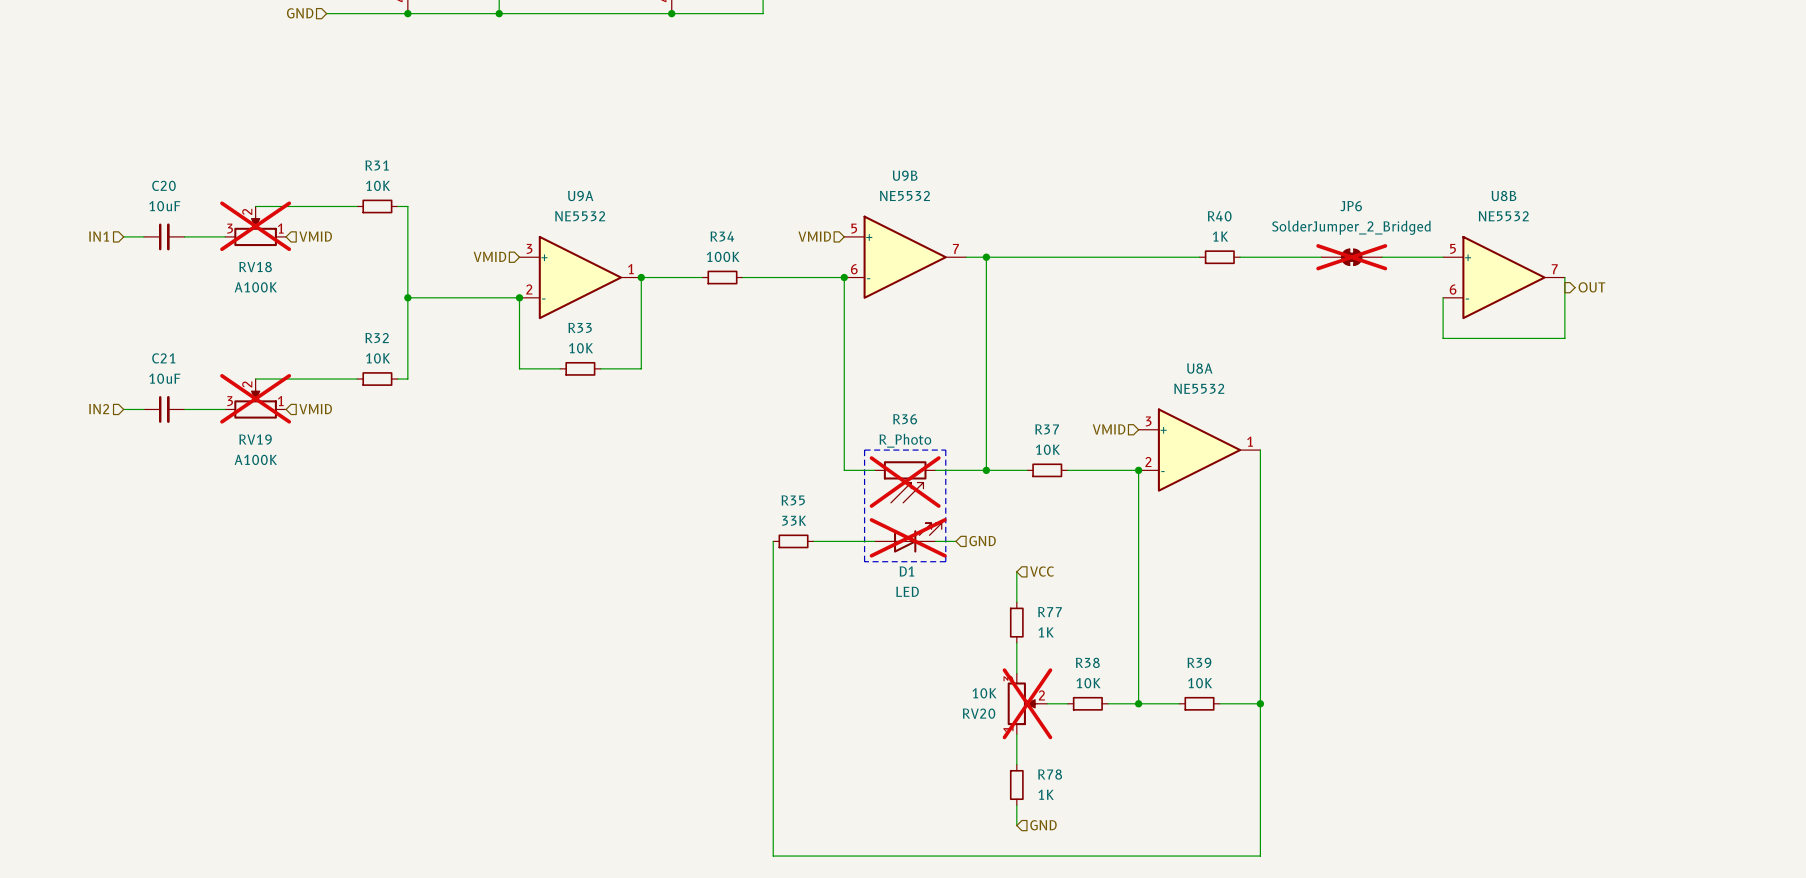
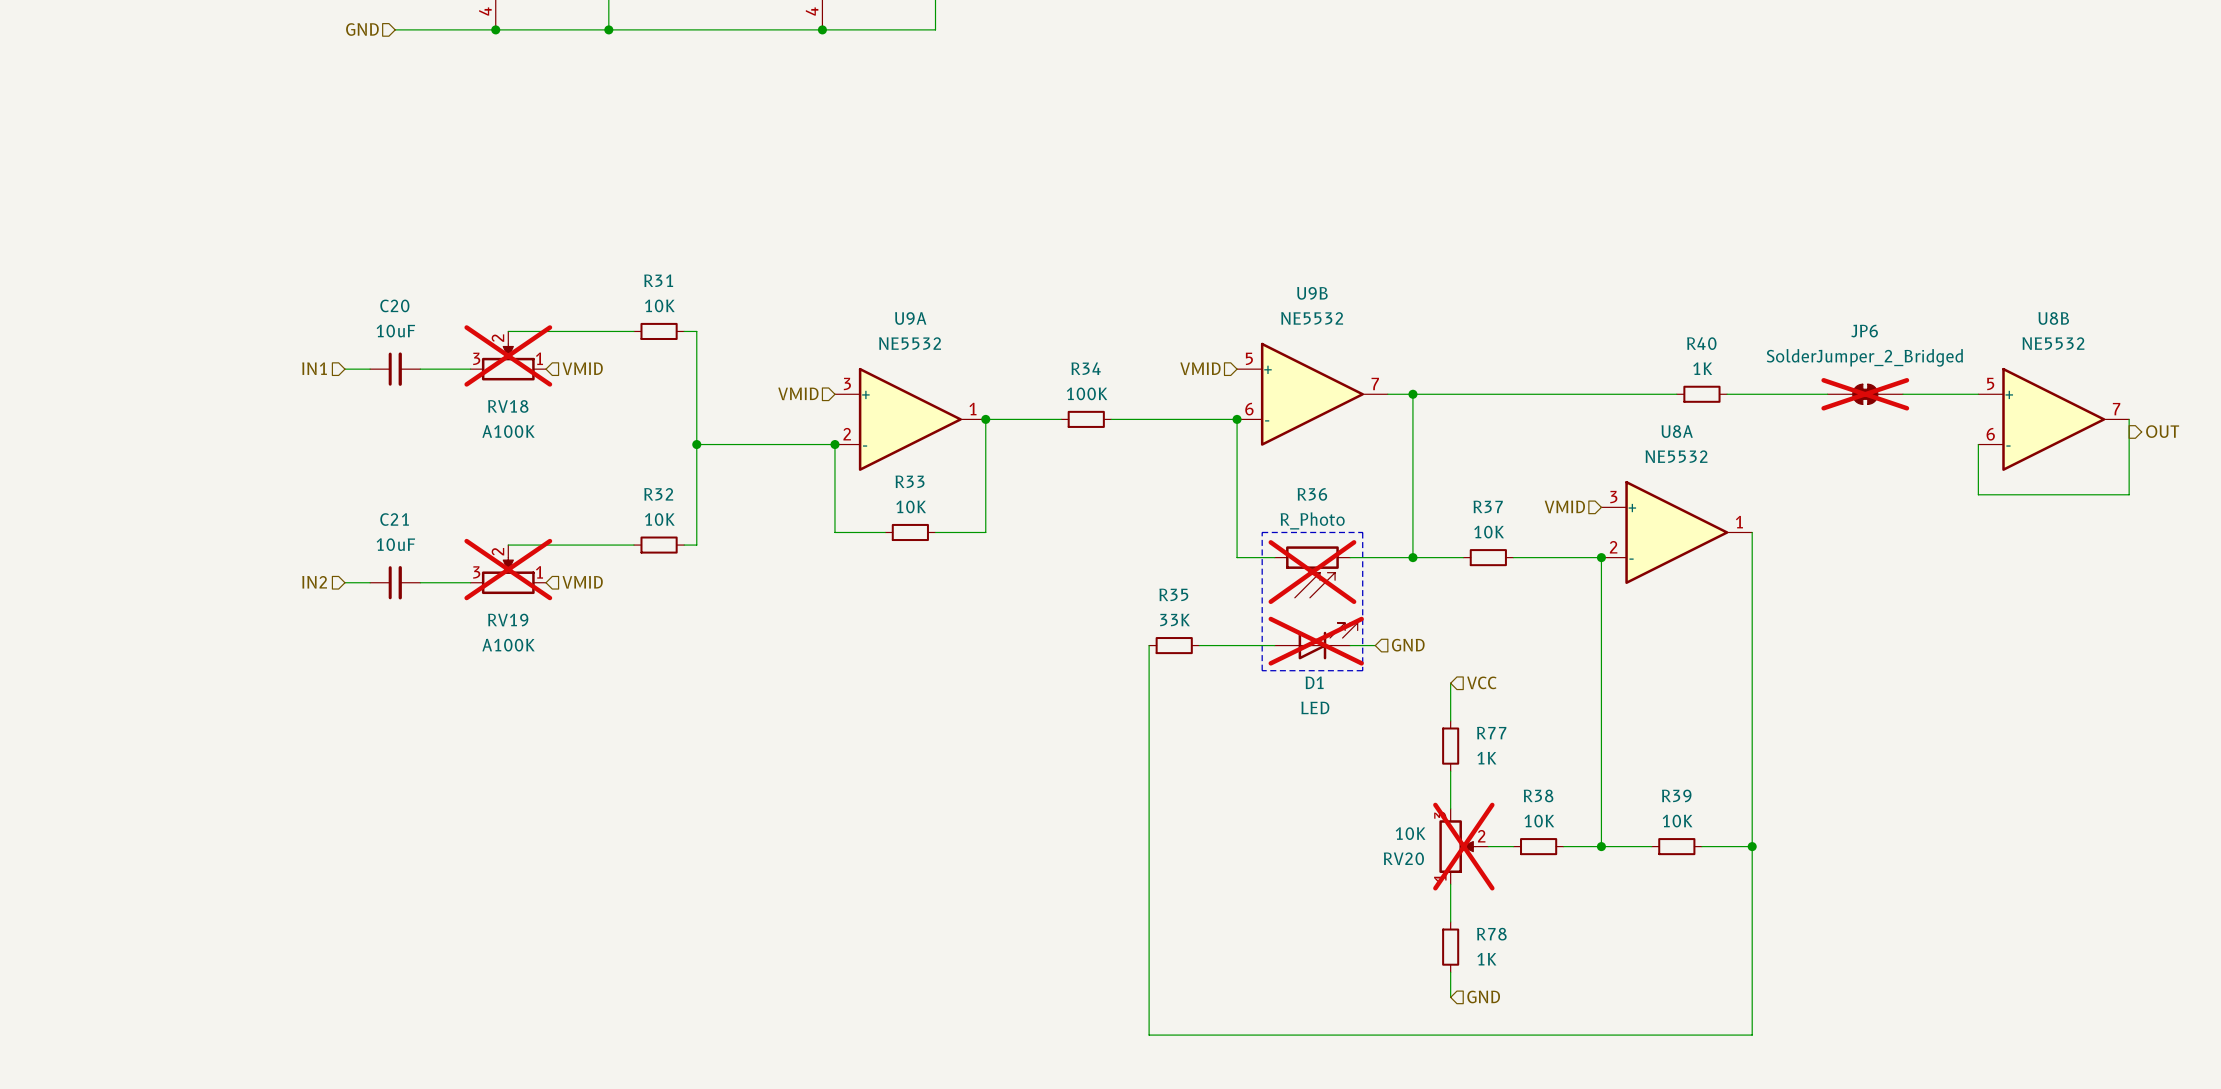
wire: (255, 206) (357, 206) -> (508, 331) (633, 331)
R31 position: (377, 206) -> (659, 331)
wire: (397, 206) (407, 206) (407, 379) (397, 379) -> (684, 331) (696, 331) (696, 545) (684, 545)
RV18 position: (255, 226) -> (508, 355)
hierarchical label position: IN1 (99, 236) -> IN1 (314, 368)
wire: (123, 236) (143, 236) -> (344, 369) (370, 369)
C20 position: (164, 236) -> (395, 369)
wire: (184, 236) (225, 236) -> (420, 369) (470, 369)
hierarchical label: VMID (315, 236) -> none
hierarchical label: VMID (814, 236) -> none
hierarchical label rotation: 0° (489, 256) -> 180° (582, 368)
U9B position: (905, 257) -> (1312, 394)
wire: (966, 257) (1199, 257) -> (1387, 394) (1676, 394)
wire: (986, 257) (986, 470) -> none
junction: (986, 257) -> none
R40 position: (1219, 257) -> (1701, 394)
wire: (1240, 257) (1321, 257) -> (1727, 394) (1827, 394)
JP6 position: (1351, 257) -> (1865, 394)
wire: (1382, 257) (1443, 257) -> (1902, 394) (1978, 394)
U9A position: (580, 277) -> (910, 419)
junction: (641, 277) -> none
wire: (702, 277) (641, 277) (641, 368) (600, 368) -> (1061, 419) (985, 419) (985, 532) (935, 532)
R34 position: (722, 277) -> (1086, 419)
wire: (742, 277) (844, 277) (844, 470) (874, 470) -> none
junction: (844, 277) -> none
U8B position: (1503, 277) -> (2053, 419)
wire: (1564, 277) (1564, 338) (1443, 338) (1443, 297) -> (2129, 419) (2129, 494) (1978, 494) (1978, 444)
hierarchical label: none -> VMID (1200, 368)
hierarchical label position: OUT (1591, 287) -> OUT (2162, 431)
wire: (407, 297) (519, 297) (519, 368) (560, 368) -> (696, 444) (834, 444) (834, 532) (885, 532)
junction: (407, 297) -> none
junction: (519, 297) -> none
hierarchical label: none -> VMID (798, 393)
wire: none -> (1412, 394) (1412, 557)
junction: none -> (1412, 394)
junction: none -> (985, 419)
wire: none -> (1111, 419) (1237, 419) (1237, 557) (1274, 557)
junction: none -> (1237, 419)
junction: none -> (696, 444)
junction: none -> (834, 444)
R33 position: (580, 368) -> (910, 532)
wire: (255, 379) (357, 379) -> (508, 545) (633, 545)
R32 position: (377, 379) -> (659, 545)
RV19 position: (255, 398) -> (508, 569)
hierarchical label: none -> VMID (1564, 506)
hierarchical label position: IN2 (99, 409) -> IN2 (314, 582)
wire: (123, 409) (143, 409) -> (344, 582) (370, 582)
C21 position: (164, 409) -> (395, 582)
wire: (184, 409) (225, 409) -> (420, 582) (470, 582)
hierarchical label: VMID (315, 409) -> none
hierarchical label: VMID (1109, 429) -> none
junction: none -> (1601, 557)
line: (864, 450) (945, 450) (945, 561) (864, 561) (864, 450) -> (1262, 532) (1362, 532) (1362, 670) (1262, 670) (1262, 532)
U8A position: (1199, 450) -> (1676, 532)
wire: (1260, 450) (1260, 856) (773, 856) (773, 541) -> (1752, 532) (1752, 1035) (1149, 1035) (1149, 645)
hierarchical label: none -> VMID (582, 582)
wire: (935, 470) (1026, 470) -> (1350, 557) (1463, 557)
junction: (986, 470) -> none
R37 position: (1047, 470) -> (1488, 557)
wire: (1067, 470) (1138, 470) (1138, 703) -> (1513, 557) (1601, 557) (1601, 846)
junction position: (1138, 470) -> (1412, 557)
R36 position: (905, 482) -> (1312, 572)
hierarchical label: none -> GND (1408, 645)
D1 position: (908, 537) -> (1316, 641)
R35 position: (793, 541) -> (1174, 645)
wire: (813, 541) (874, 541) -> (1199, 645) (1274, 645)
wire: (935, 541) (955, 541) -> (1350, 645) (1375, 645)
hierarchical label: GND (982, 541) -> none
wire: (1016, 571) (1016, 602) -> (1450, 683) (1450, 720)
hierarchical label position: VCC (1042, 571) -> VCC (1481, 682)
R77 position: (1016, 622) -> (1450, 746)
wire: (1016, 642) (1016, 673) -> (1450, 771) (1450, 808)
wire: none -> (1563, 846) (1651, 846)
junction: none -> (1601, 846)
junction: none -> (1752, 846)
RV20 position: (1027, 703) -> (1463, 846)
wire: (1047, 703) (1067, 703) -> (1488, 846) (1513, 846)
R38 position: (1087, 703) -> (1538, 846)
wire: (1108, 703) (1179, 703) -> (1450, 921) (1450, 884)
junction: (1138, 703) -> none
R39 position: (1199, 703) -> (1676, 846)
wire: (1219, 703) (1260, 703) -> (1701, 846) (1752, 846)
junction: (1260, 703) -> none
wire: (1016, 734) (1016, 764) -> none
R78 position: (1016, 784) -> (1450, 947)
hierarchical label: none -> GND (1483, 996)
wire: (1016, 805) (1016, 825) -> (1450, 972) (1450, 997)
hierarchical label: GND (1043, 825) -> none

